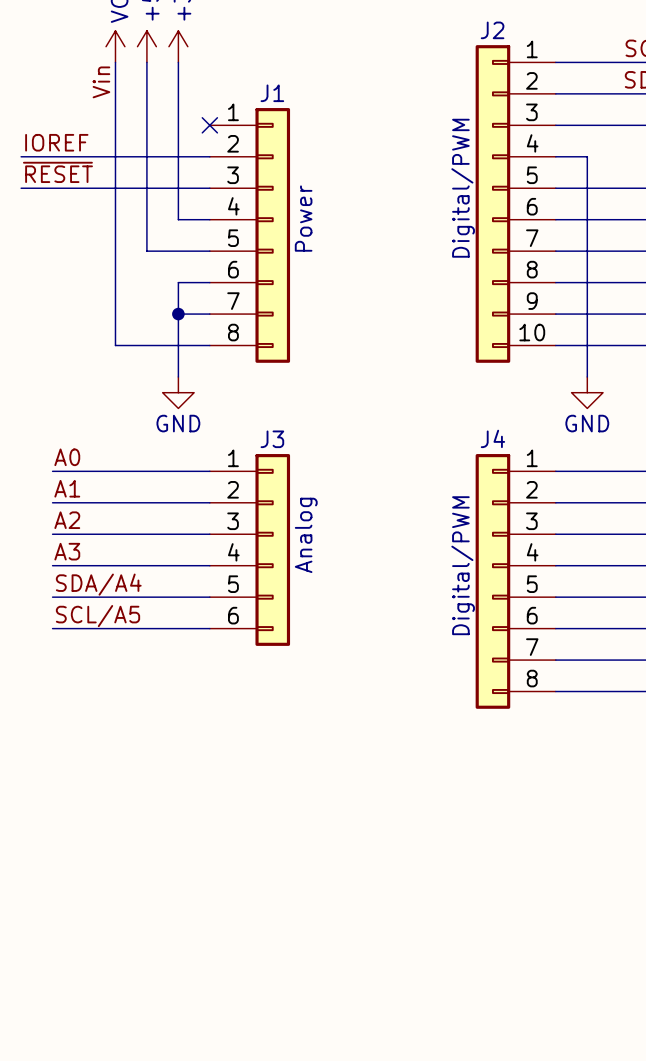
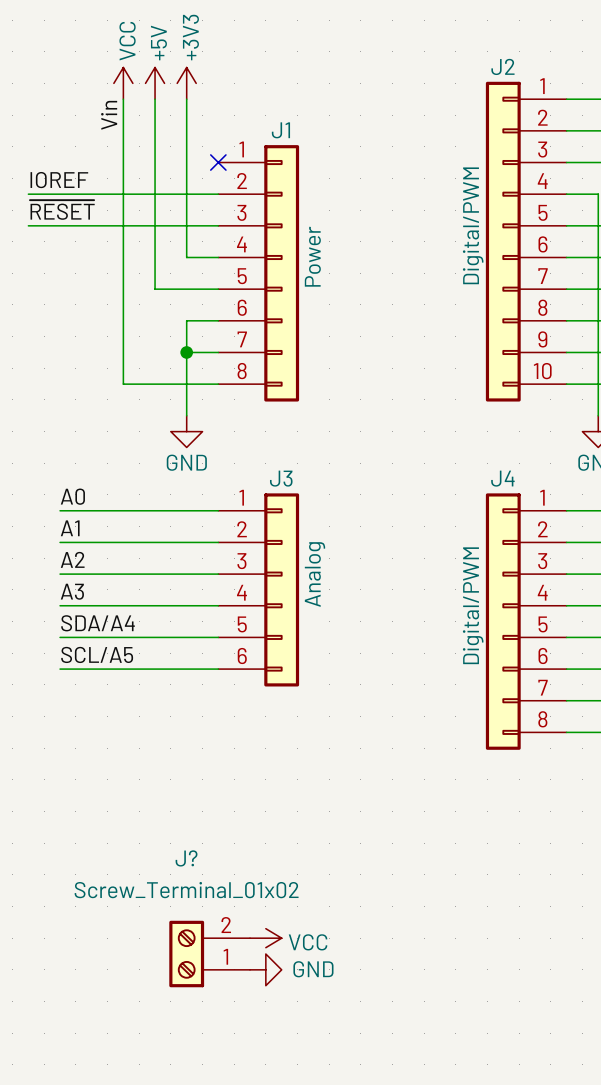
power symbol: none -> VCC (265, 938)
J?: none -> Screw_Terminal_01x02 (209, 954)
power symbol: none -> GND (265, 969)

